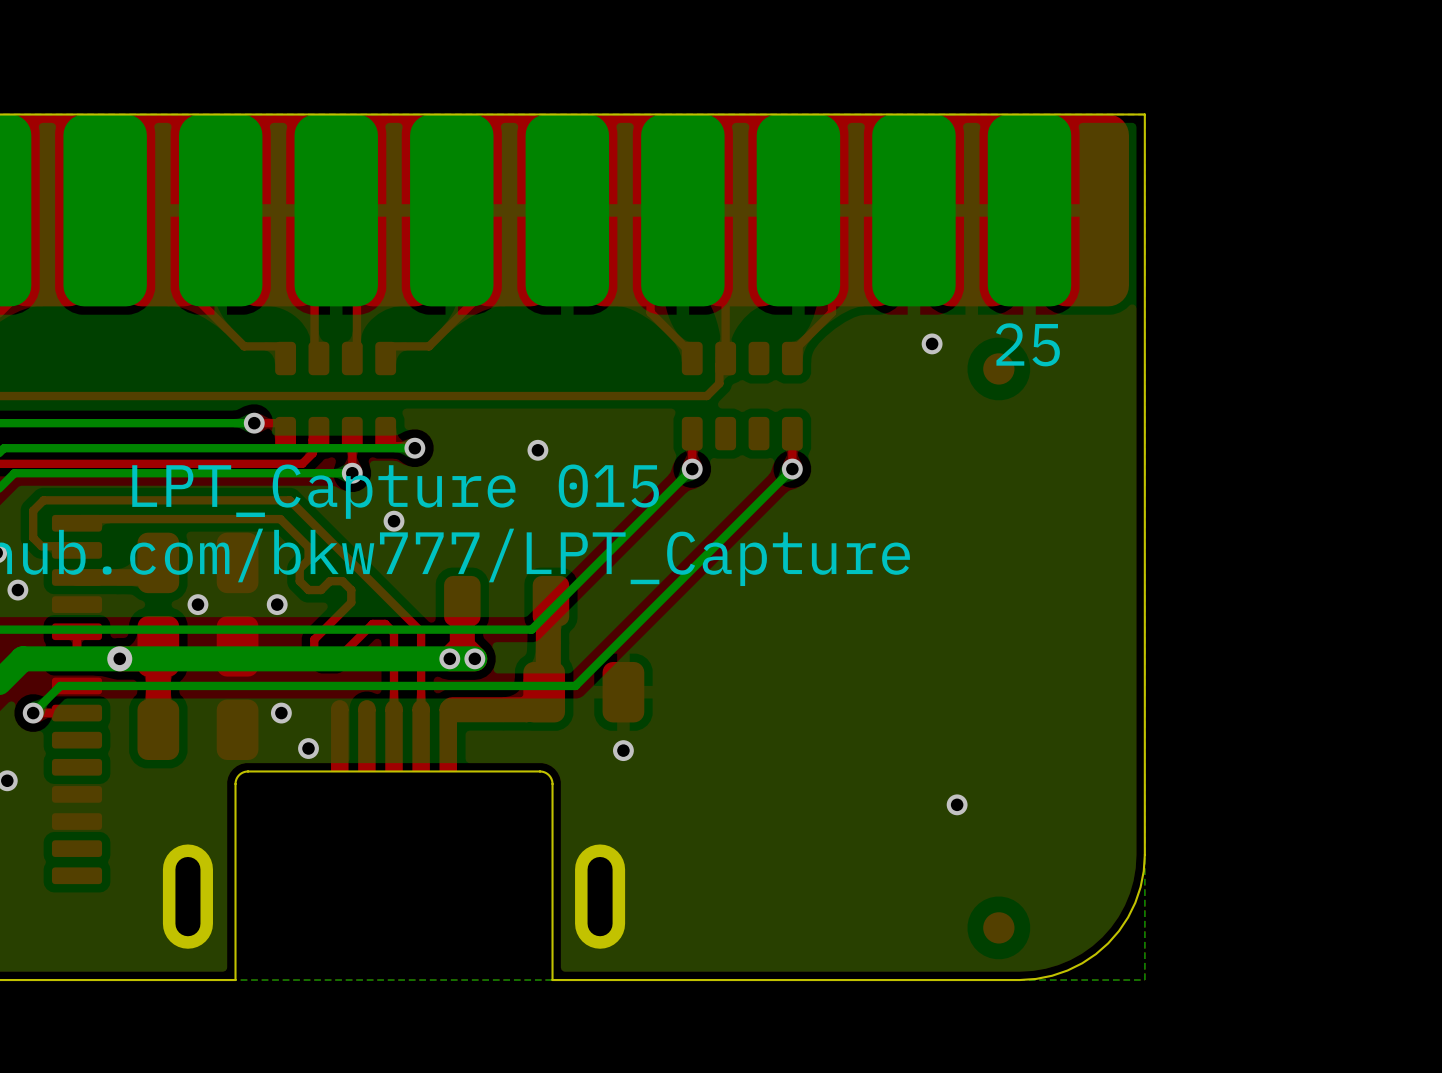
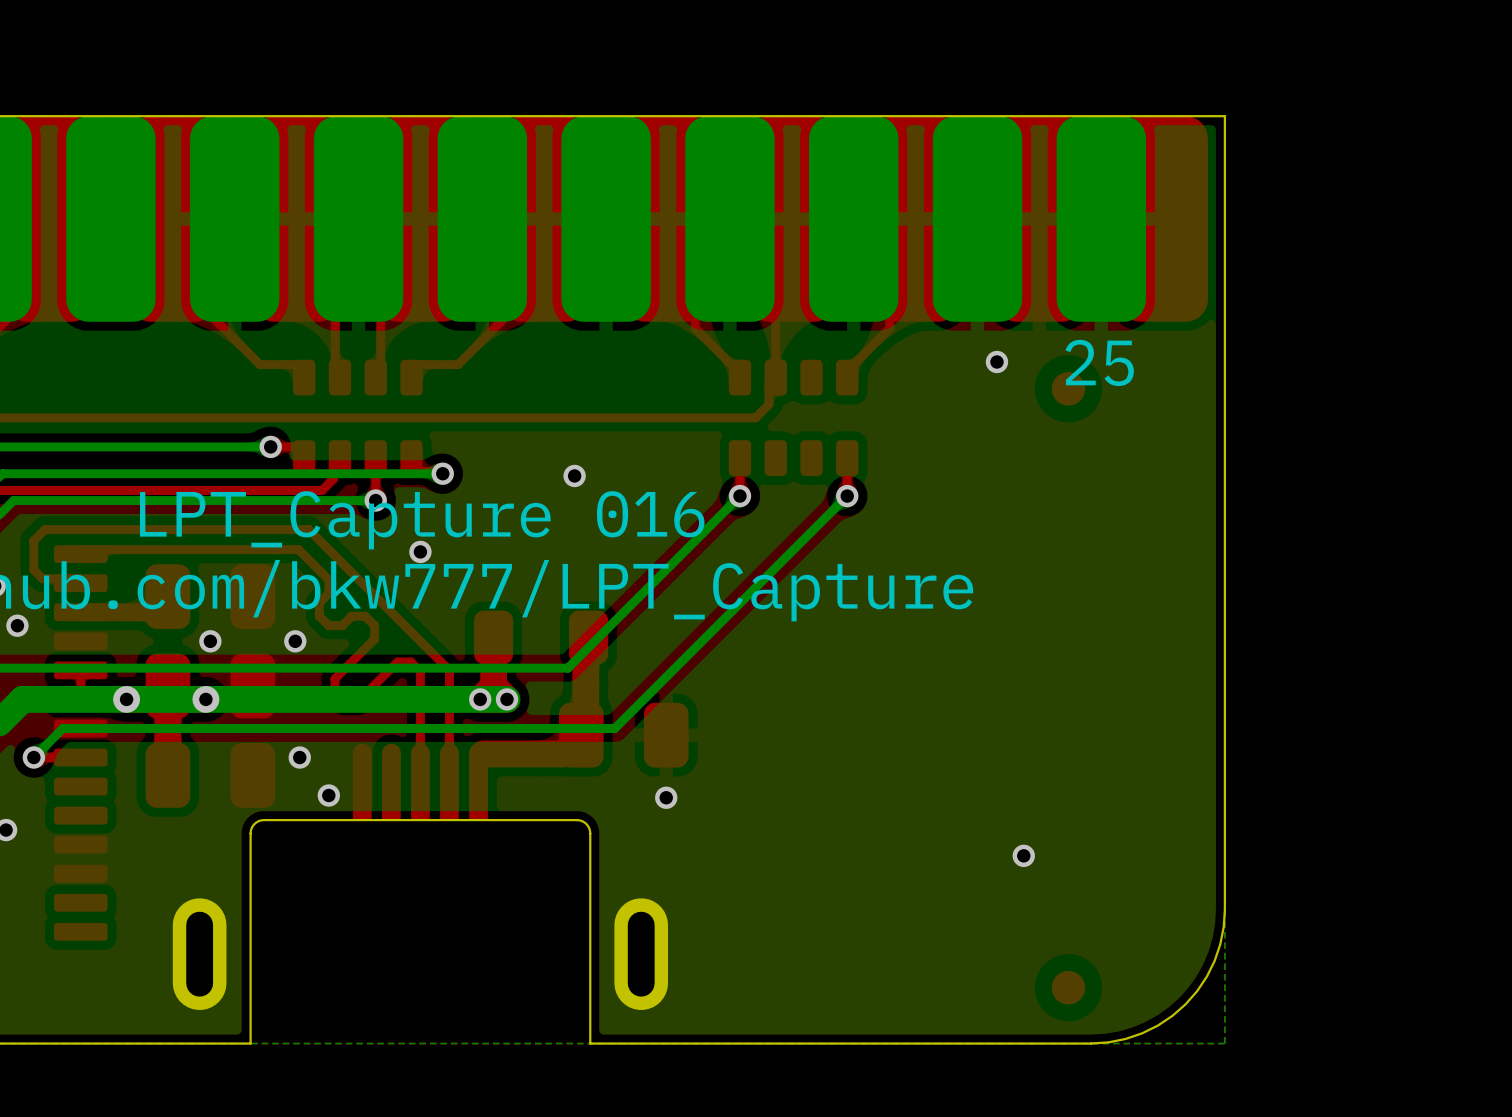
text: LPT_Capture 015 (395, 491) -> LPT_Capture 016 (422, 520)
via: none -> (205, 699)

